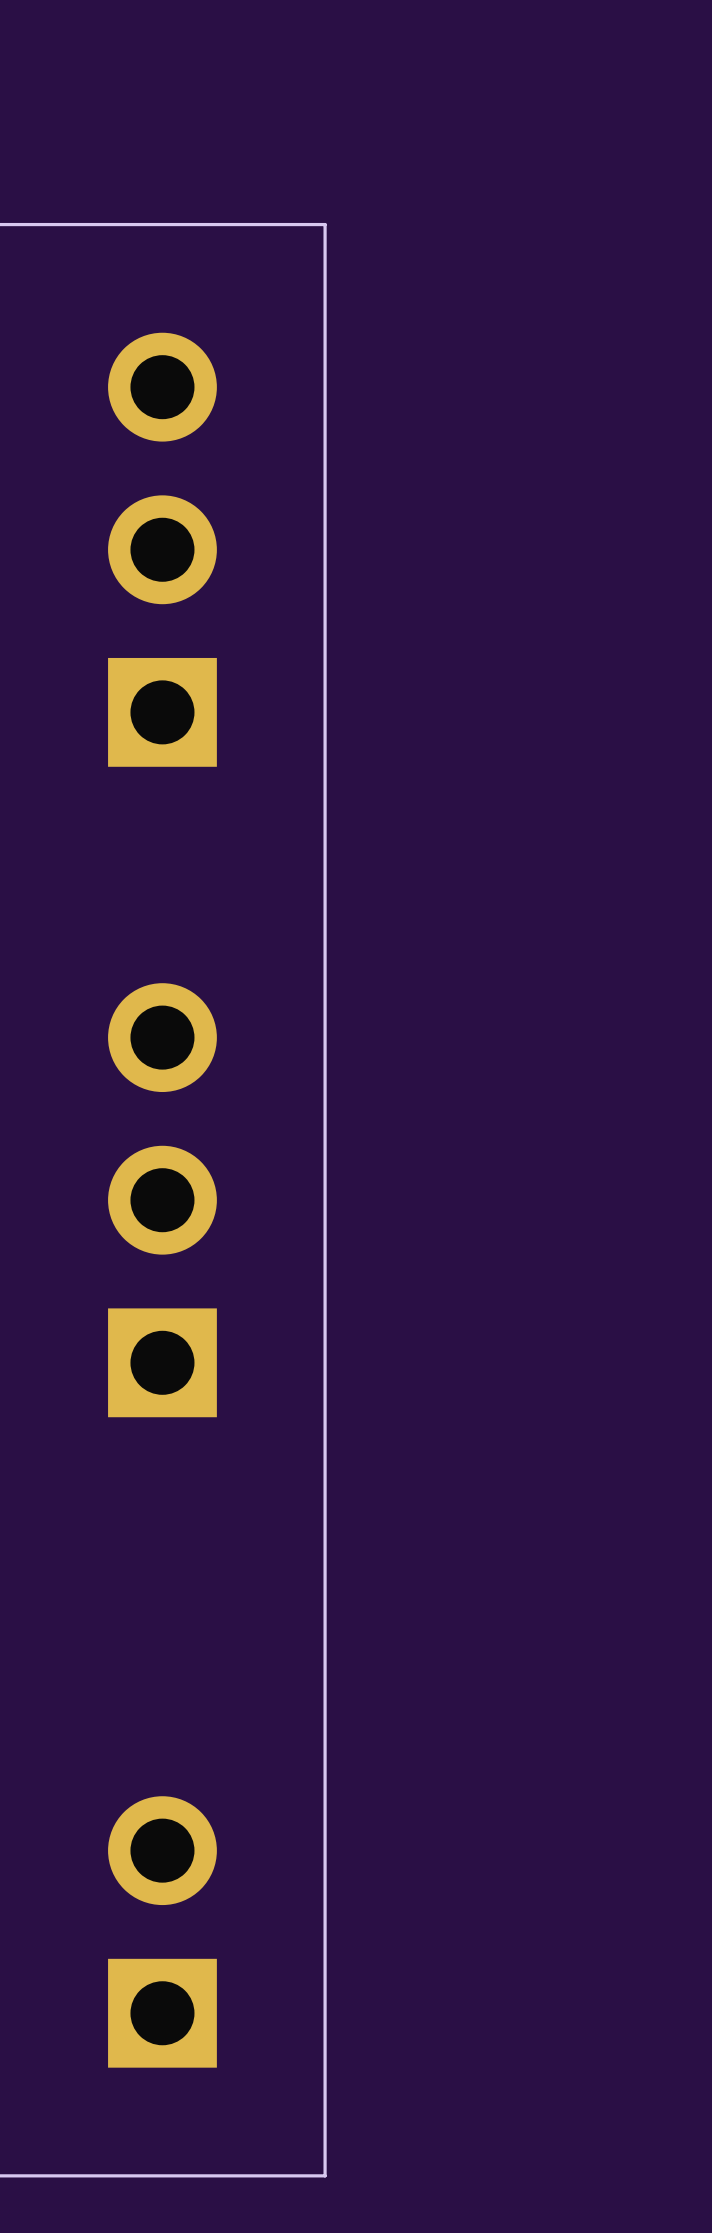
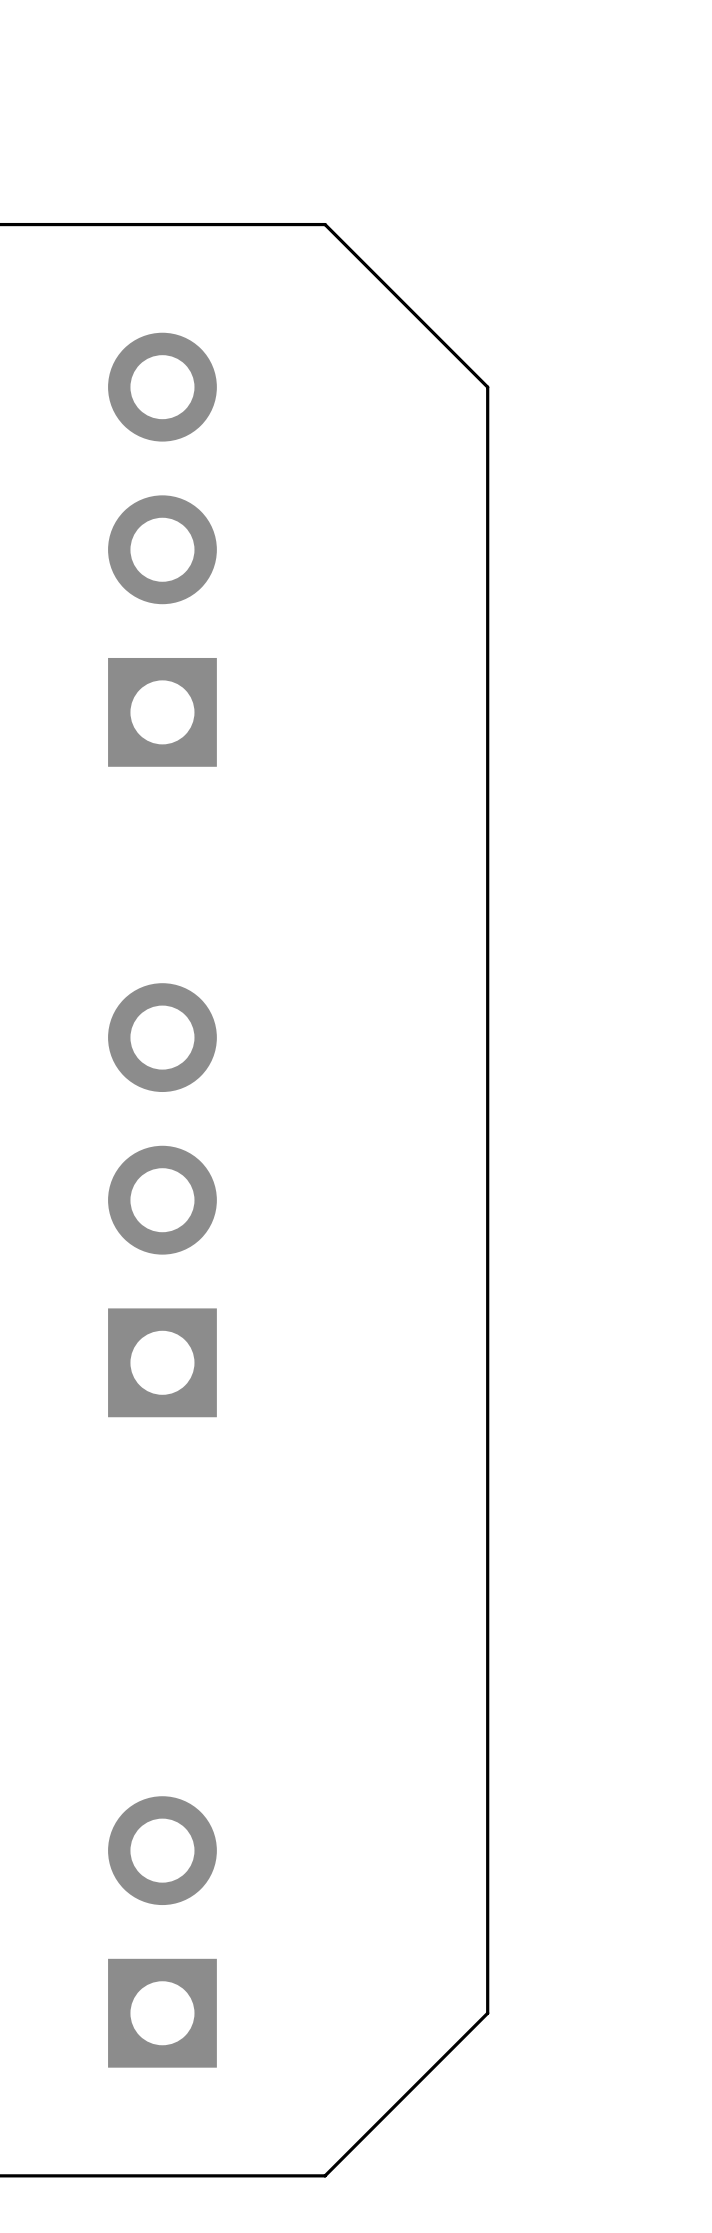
board edge: (325, 224) (325, 2175) -> (325, 224) (487, 387) (487, 2013) (325, 2175)

